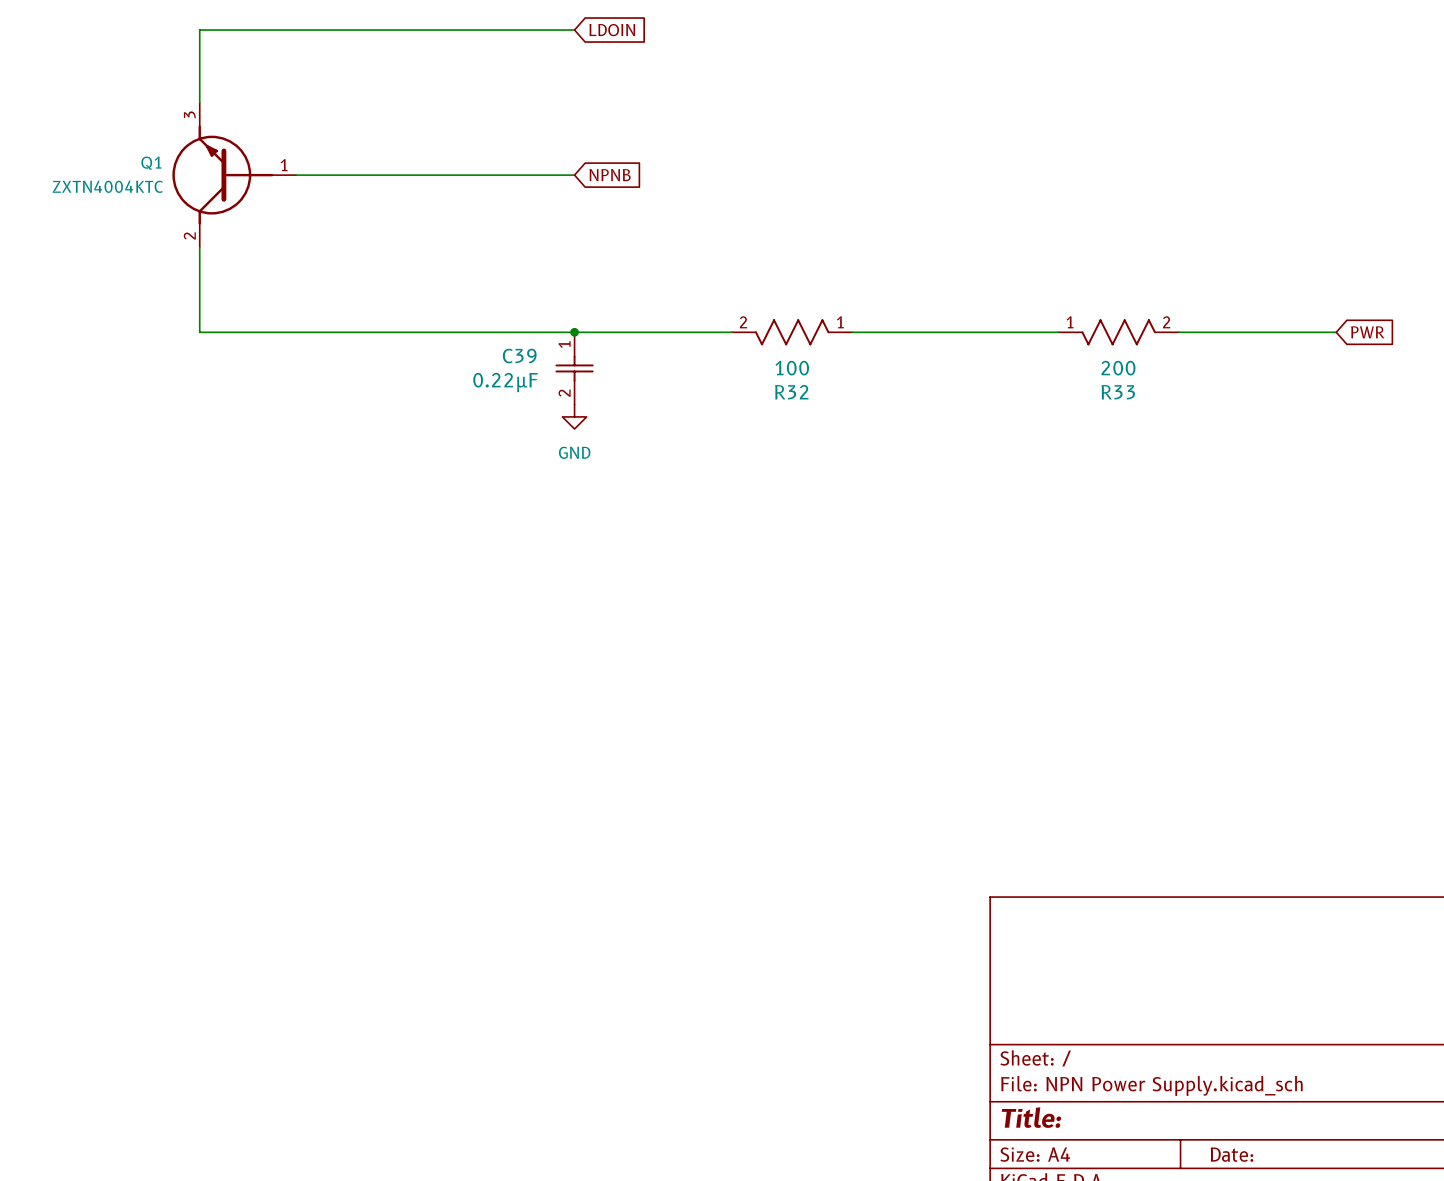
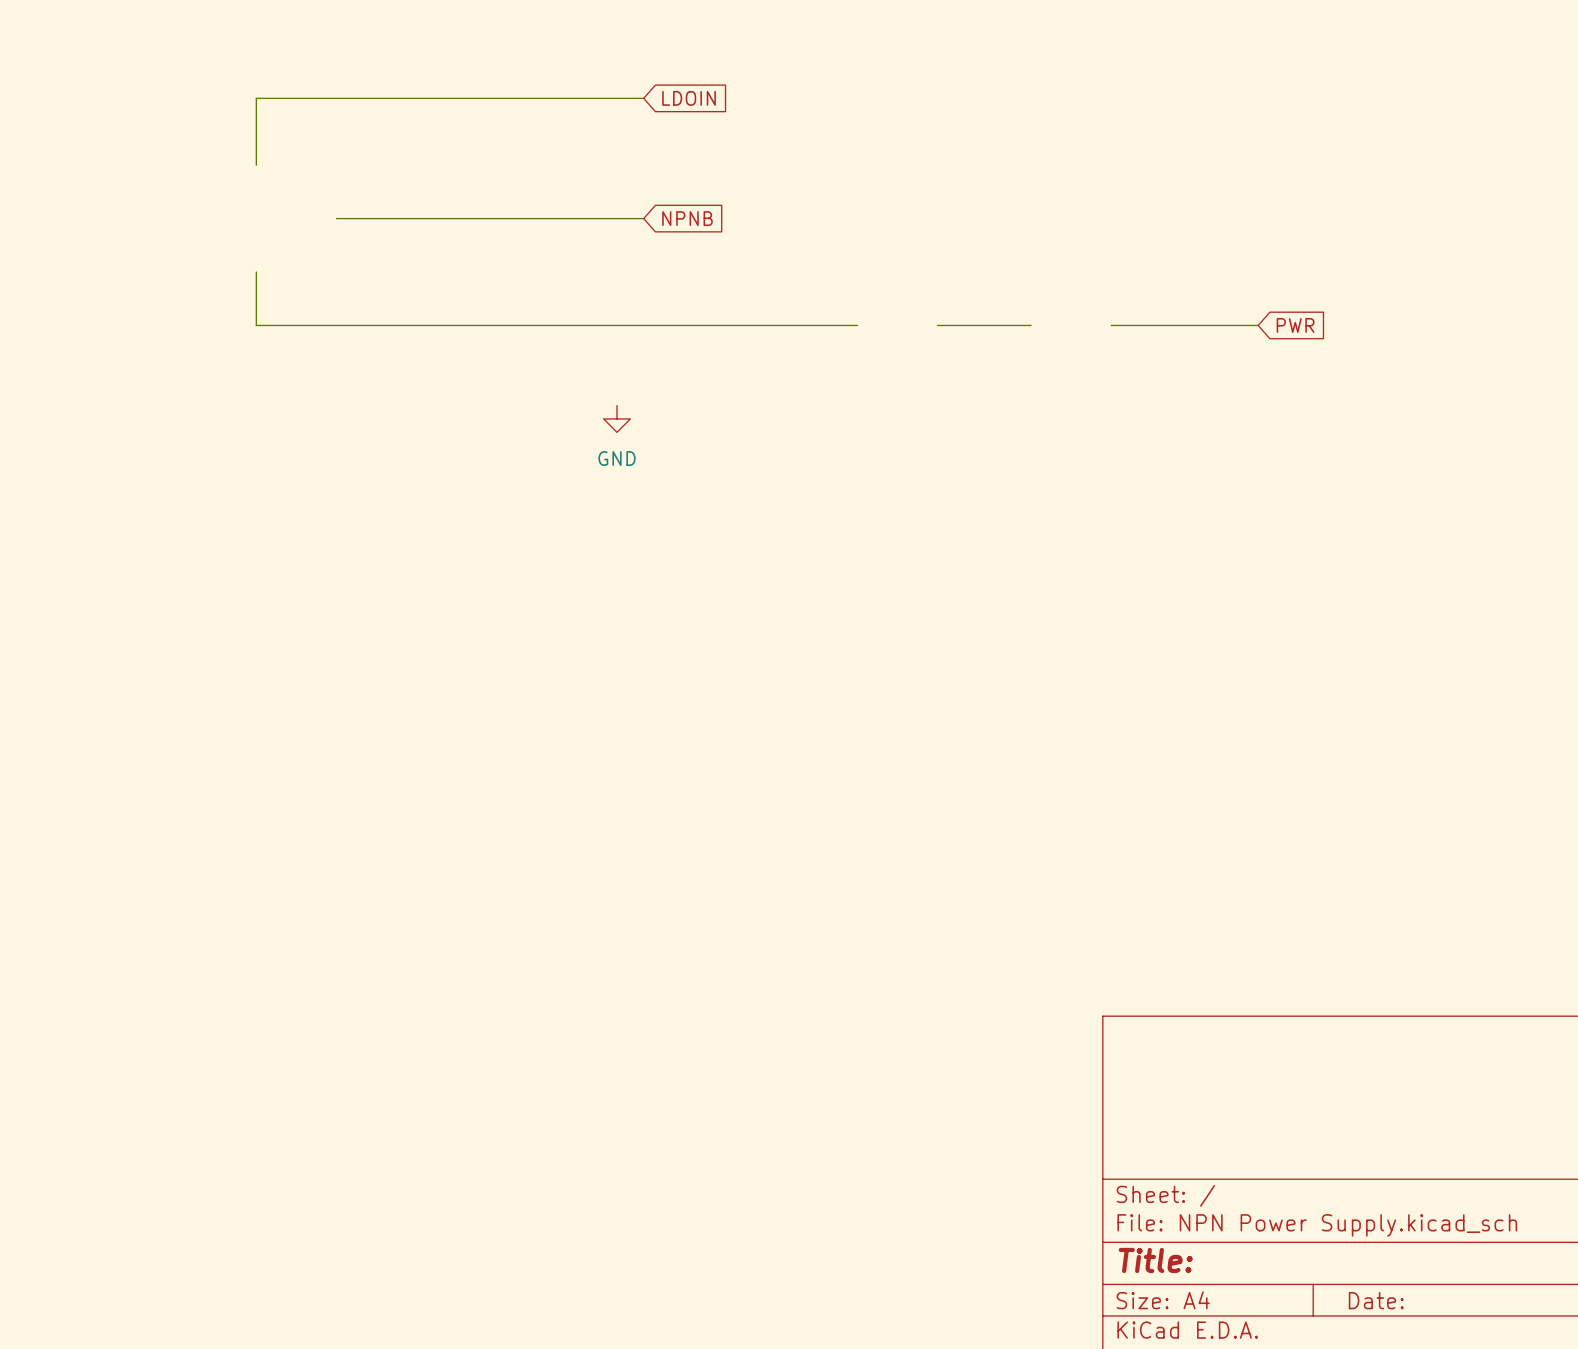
wire: (574, 30) (199, 30) (199, 102) -> none
global label position: LDOIN (612, 30) -> LDOIN (689, 98)
wire: none -> (643, 98) (256, 98) (256, 165)
Q1: ZXTN4004KTC (234, 175) -> none
wire: none -> (256, 272) (256, 325) (857, 325)
wire: (199, 247) (199, 332) (731, 332) -> none
wire: none -> (937, 325) (1031, 325)
wire: none -> (1111, 325) (1258, 325)
junction: (574, 332) -> none
R32: 100 (792, 332) -> none
wire: (852, 332) (1058, 332) -> none
R33: 200 (1118, 332) -> none
wire: (1179, 332) (1336, 332) -> none
global label position: PWR (1367, 332) -> PWR (1295, 325)
C39: 0.22µF (574, 368) -> none
power symbol position: GND (574, 416) -> GND (617, 418)

